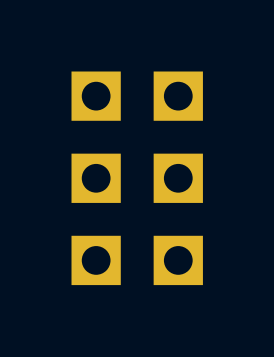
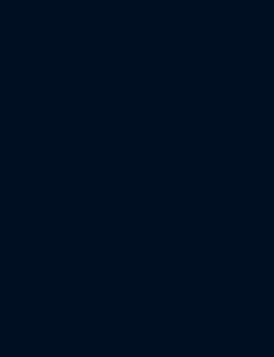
part: (137, 178) -> none

